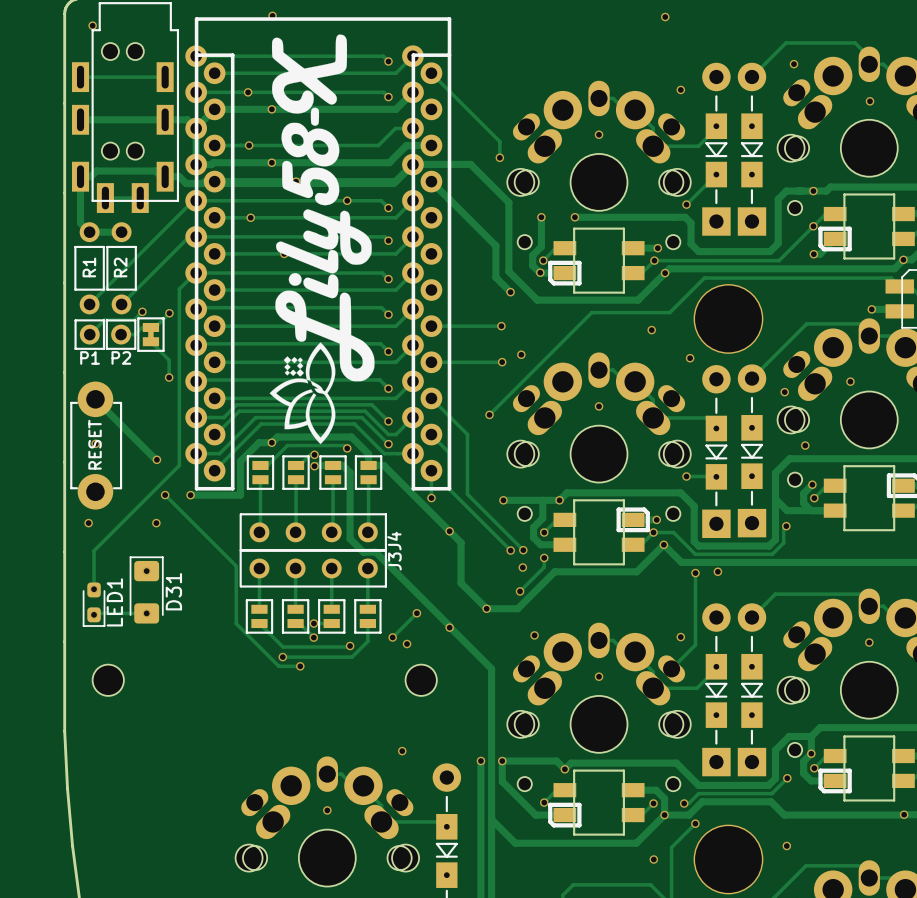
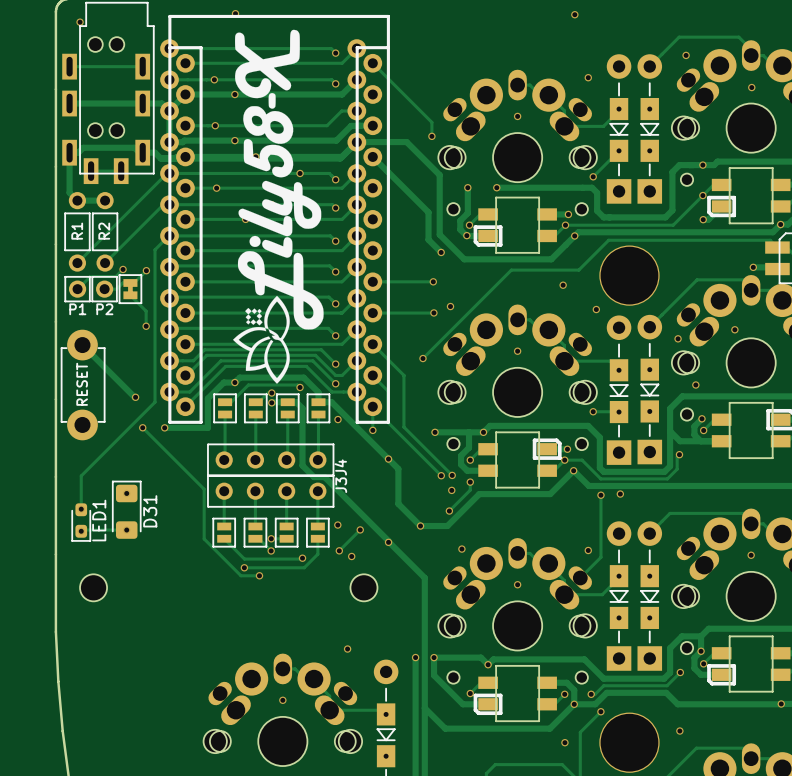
via: (95, 443) -> none
via: none -> (338, 419)
via: (88, 523) -> none
via: (156, 523) -> none
via: none -> (337, 525)

